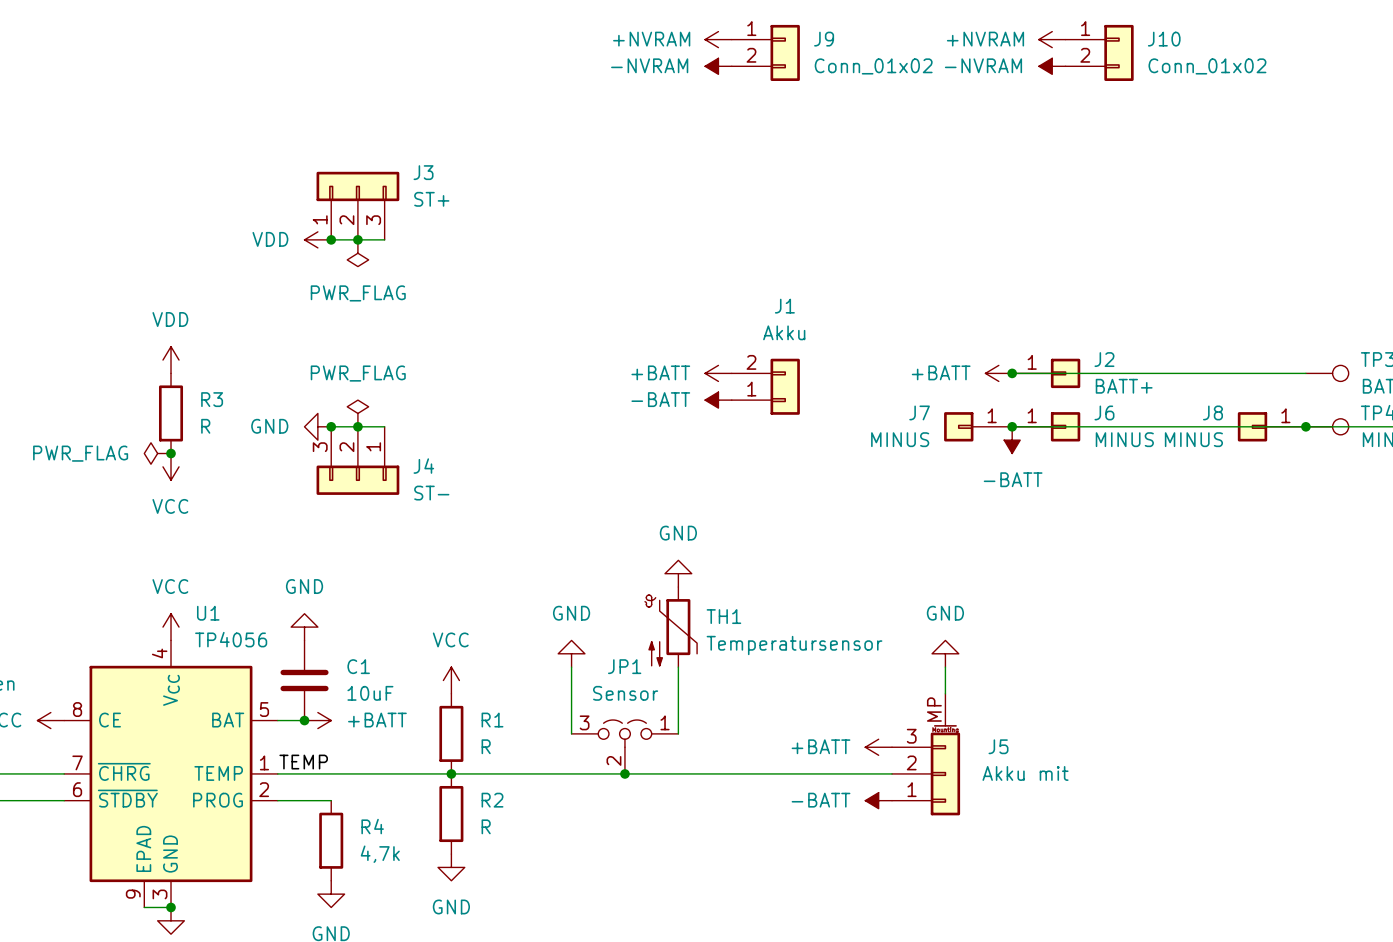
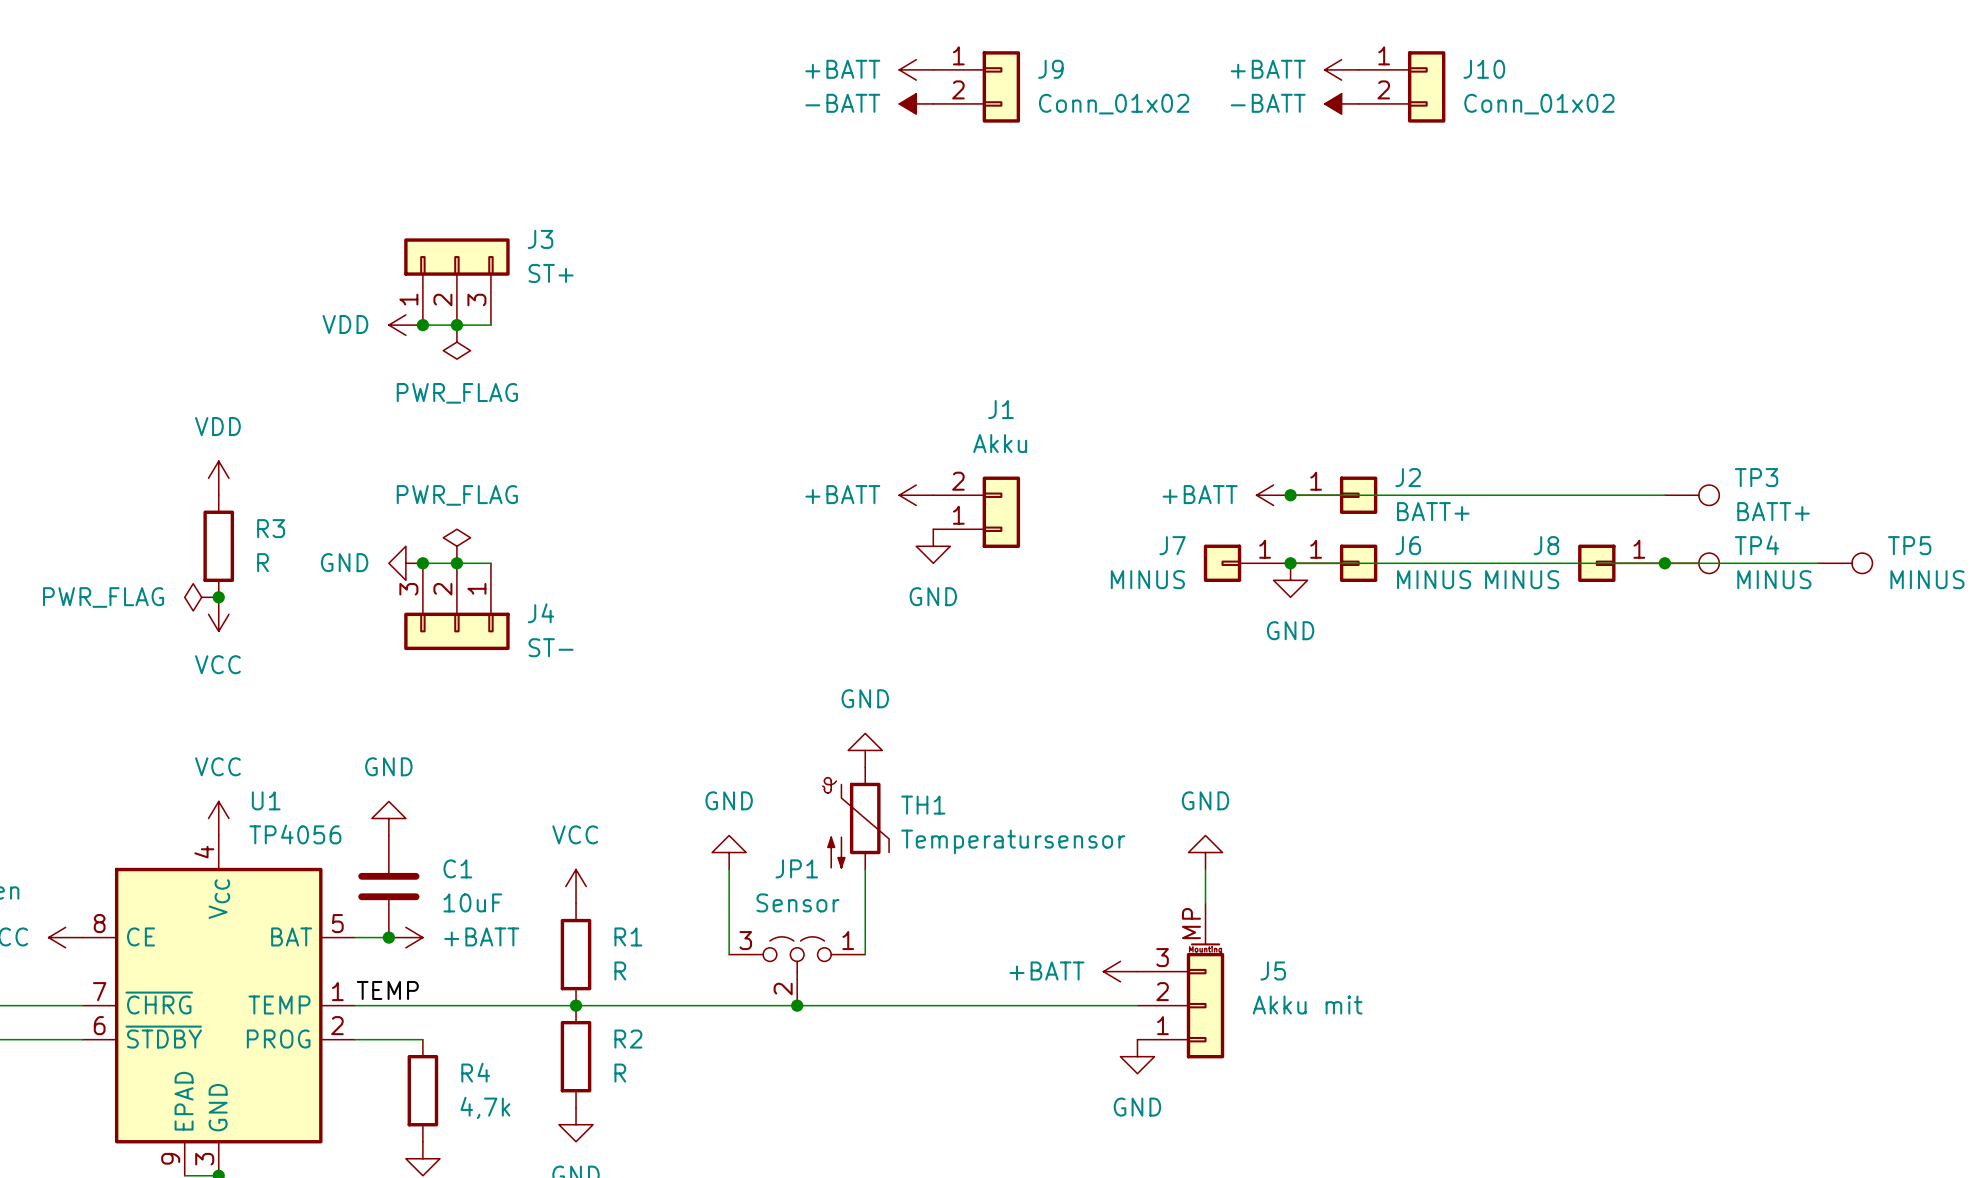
power symbol: +NVRAM (718, 39) -> +BATT (916, 69)
power symbol: +NVRAM (1052, 39) -> +BATT (1341, 69)
power symbol: -NVRAM (718, 66) -> -BATT (916, 103)
power symbol: -NVRAM (1052, 66) -> -BATT (1341, 103)
power symbol: -BATT (718, 400) -> none
power symbol: none -> GND (933, 546)
power symbol: -BATT (1012, 440) -> GND (1290, 580)
power symbol: -BATT (878, 800) -> none
power symbol: none -> GND (1137, 1056)

